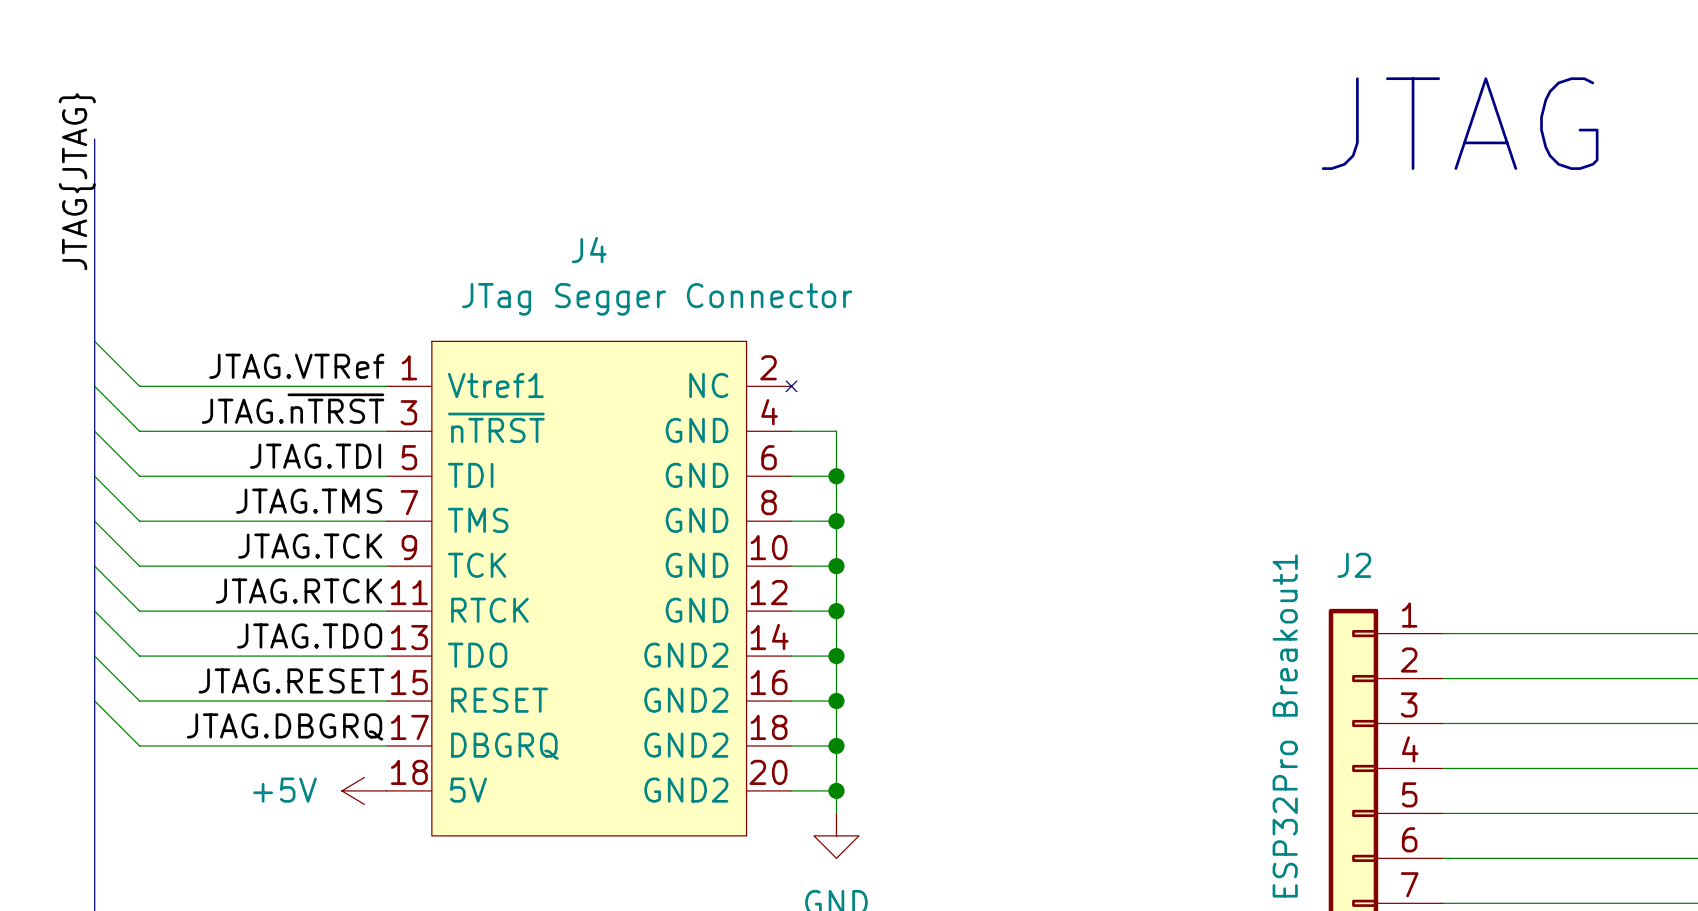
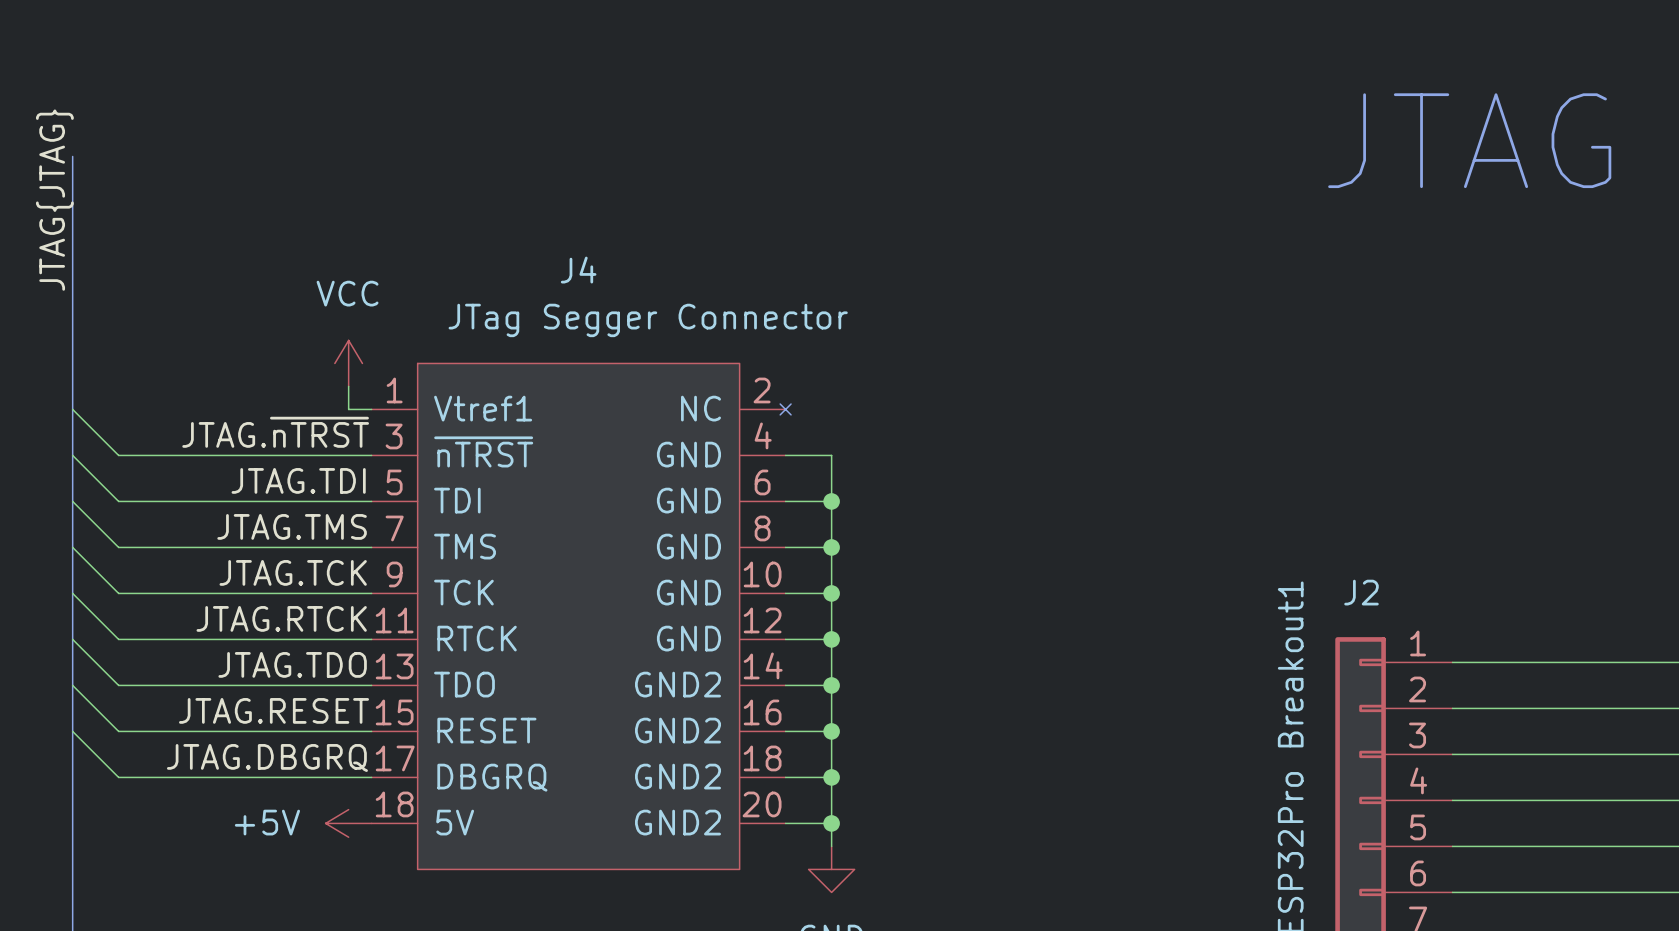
wire: (94, 341) (139, 386) (364, 386) -> (348, 386) (348, 409)
power symbol: none -> VCC (348, 363)
label: JTAG.VTRef (296, 366) -> none

